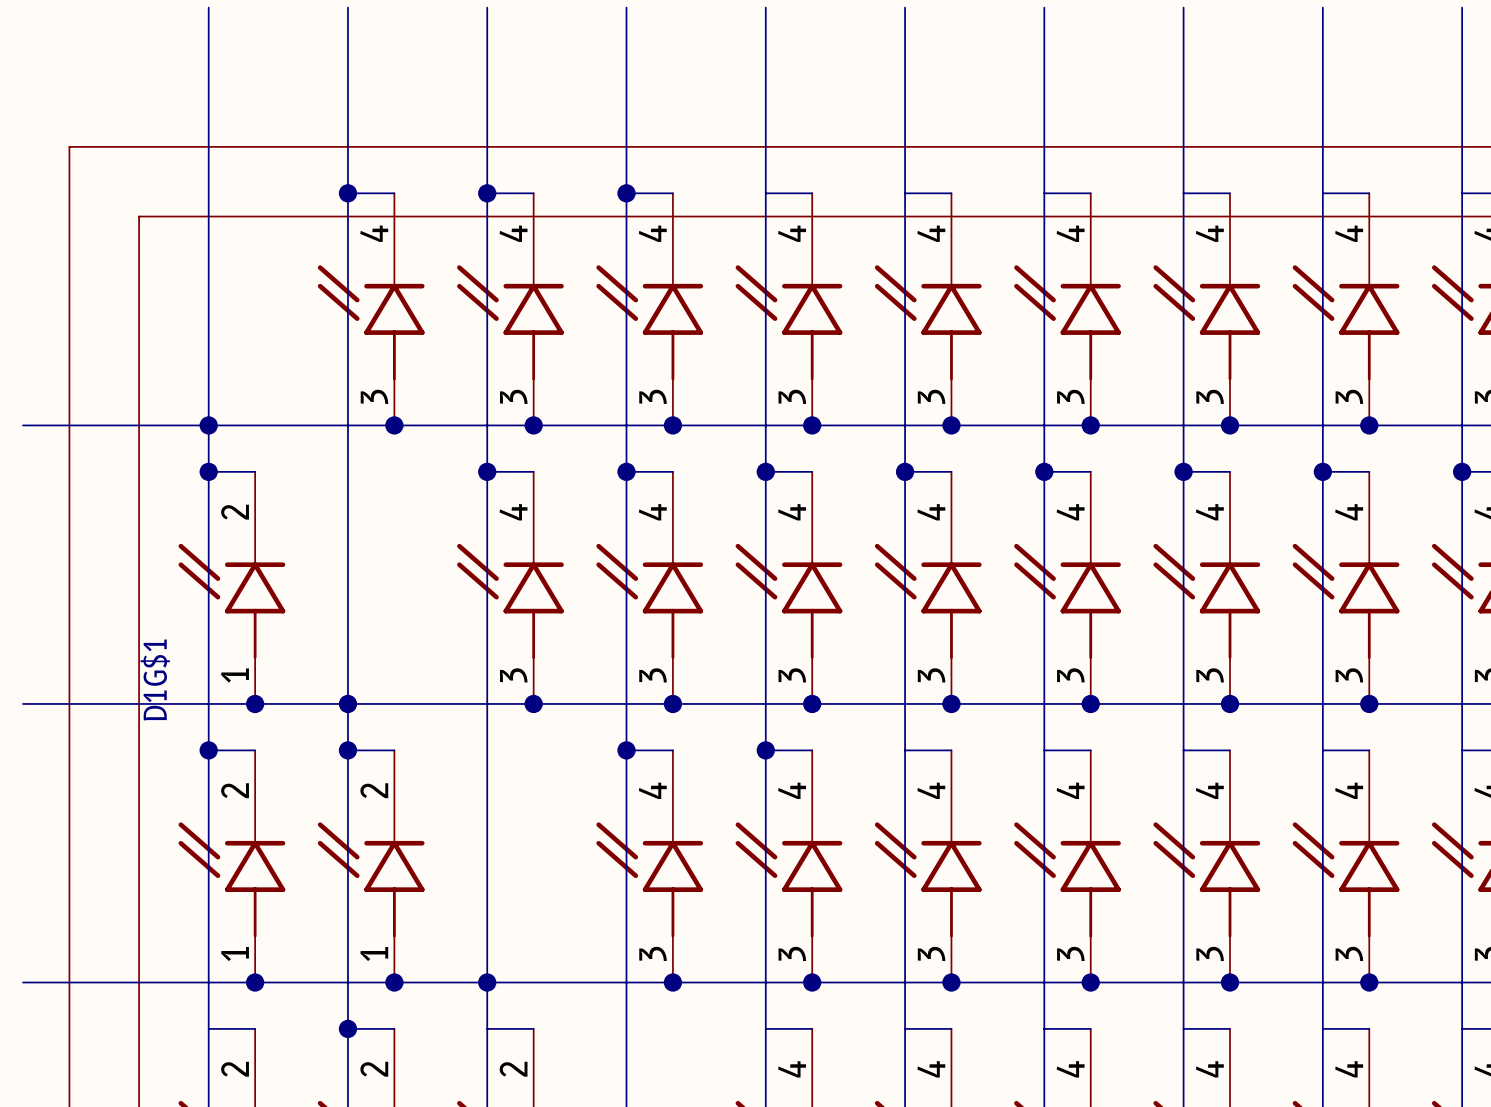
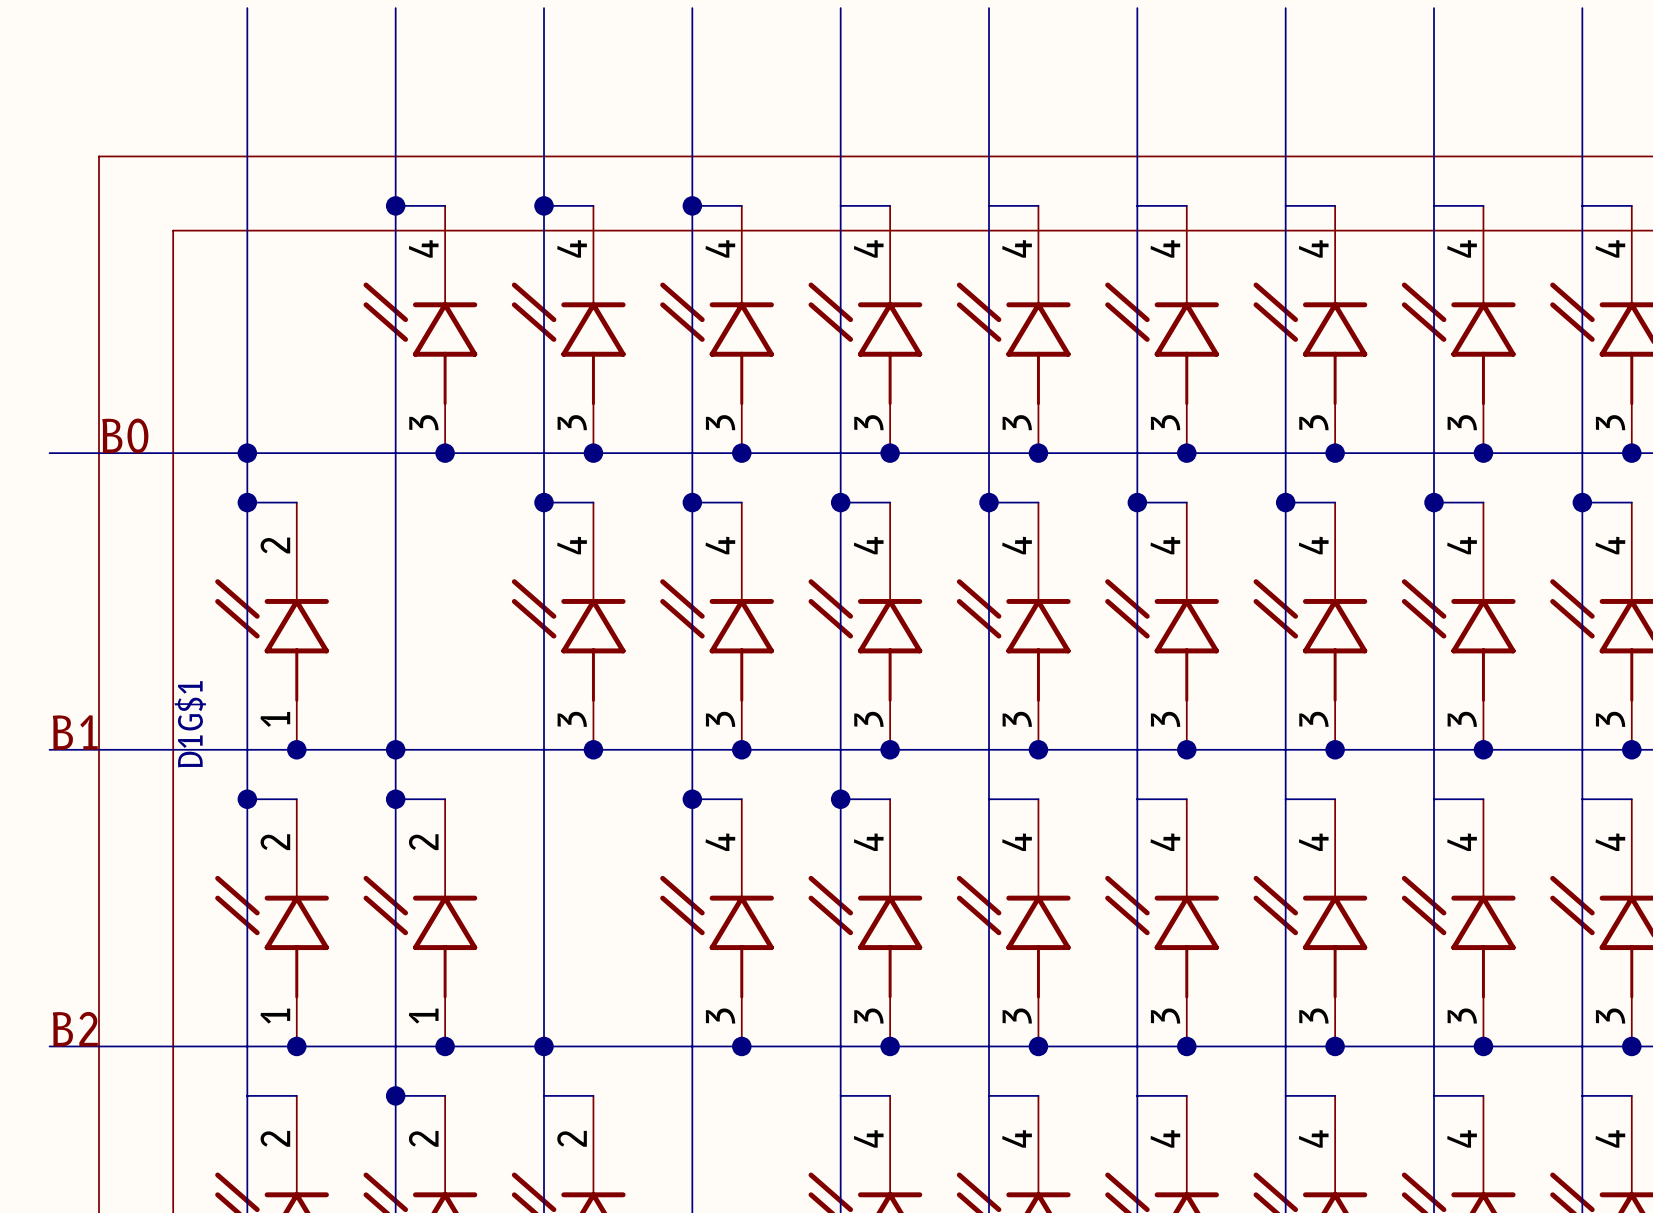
label: none -> B0 (125, 436)
label: none -> B1 (75, 732)
label: none -> B2 (75, 1029)

